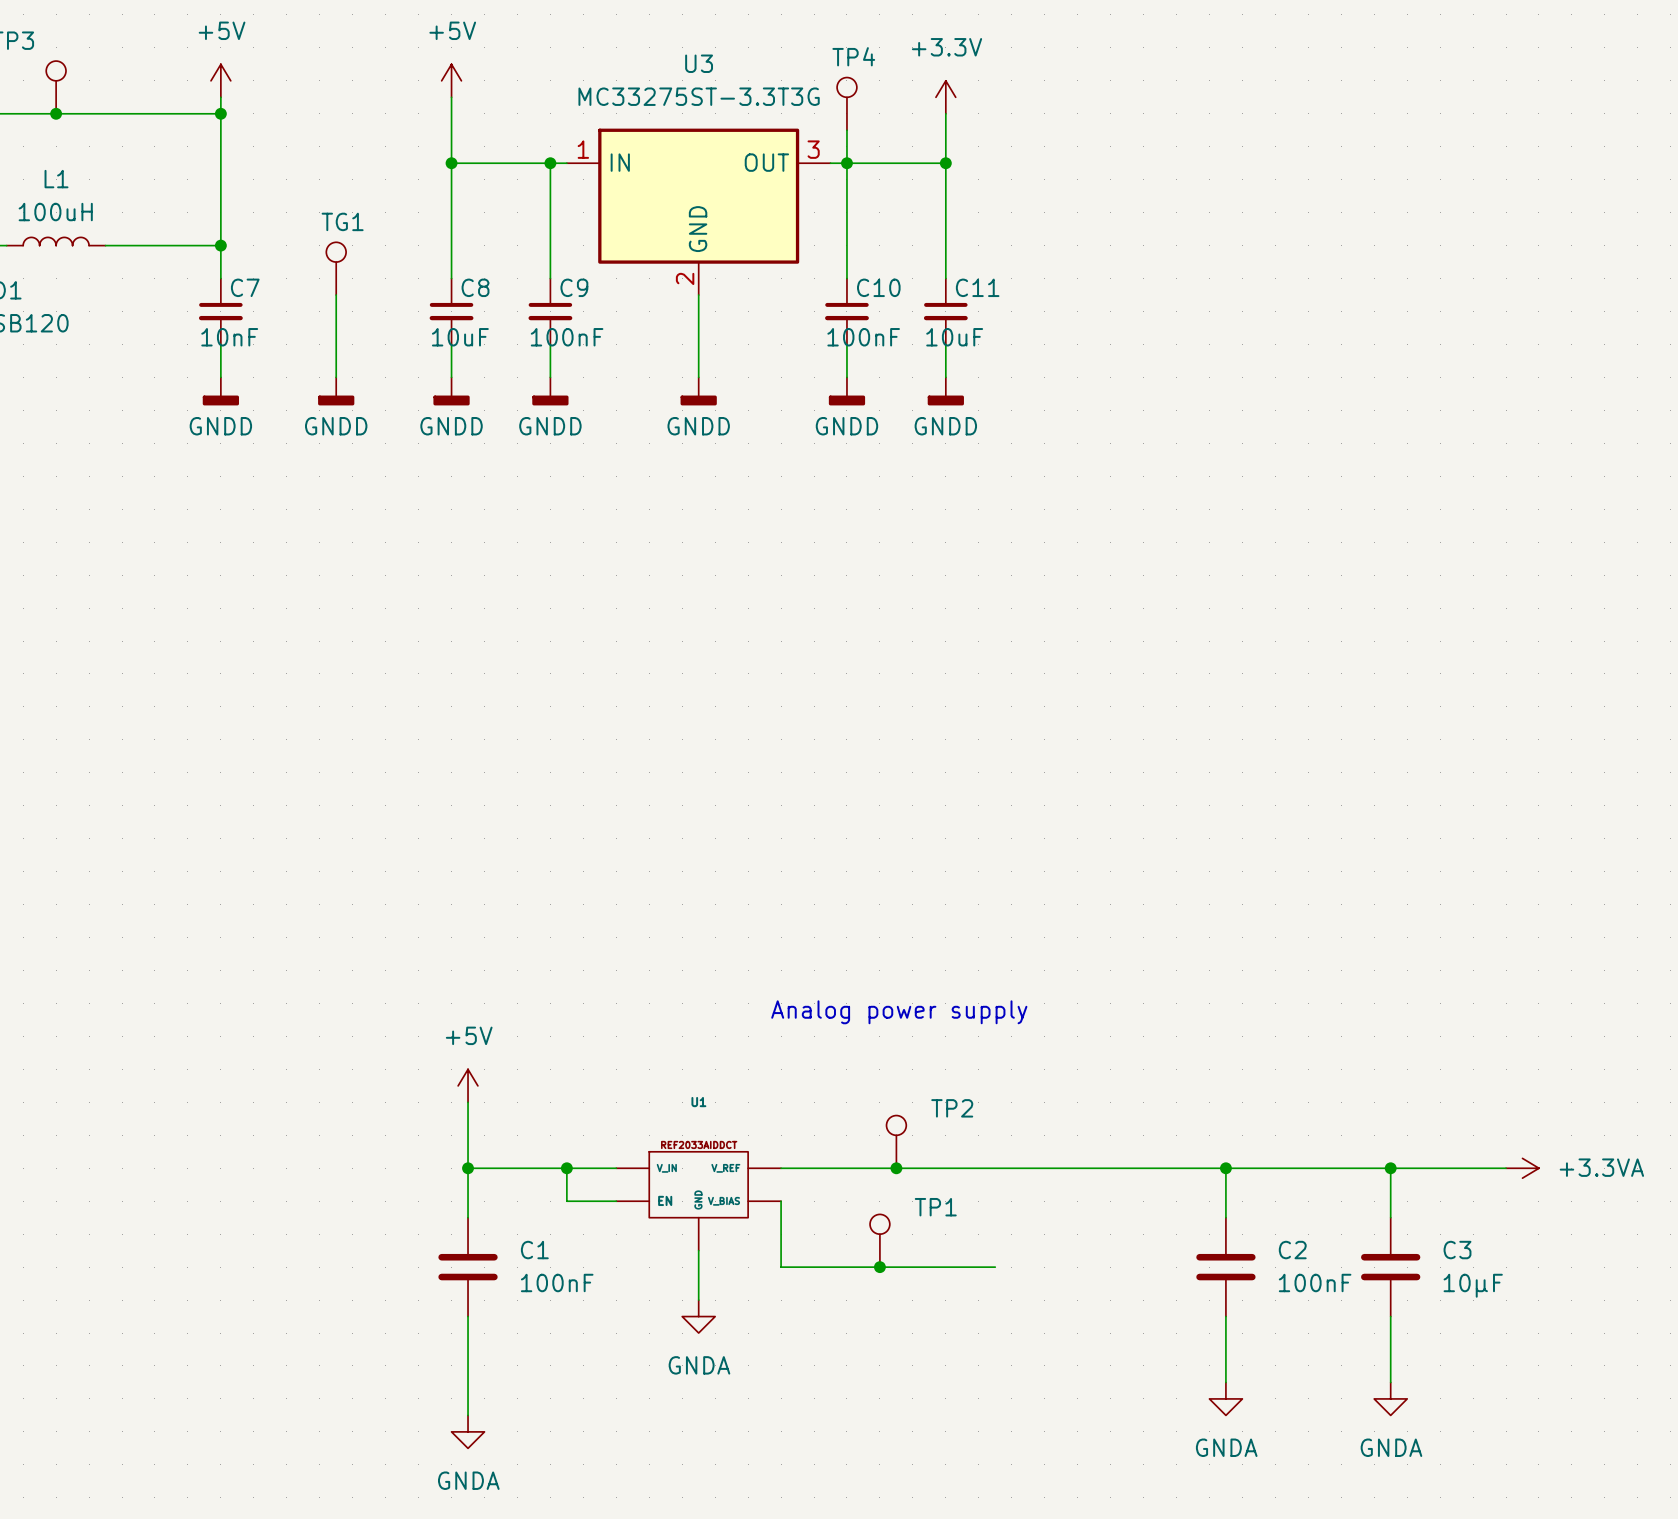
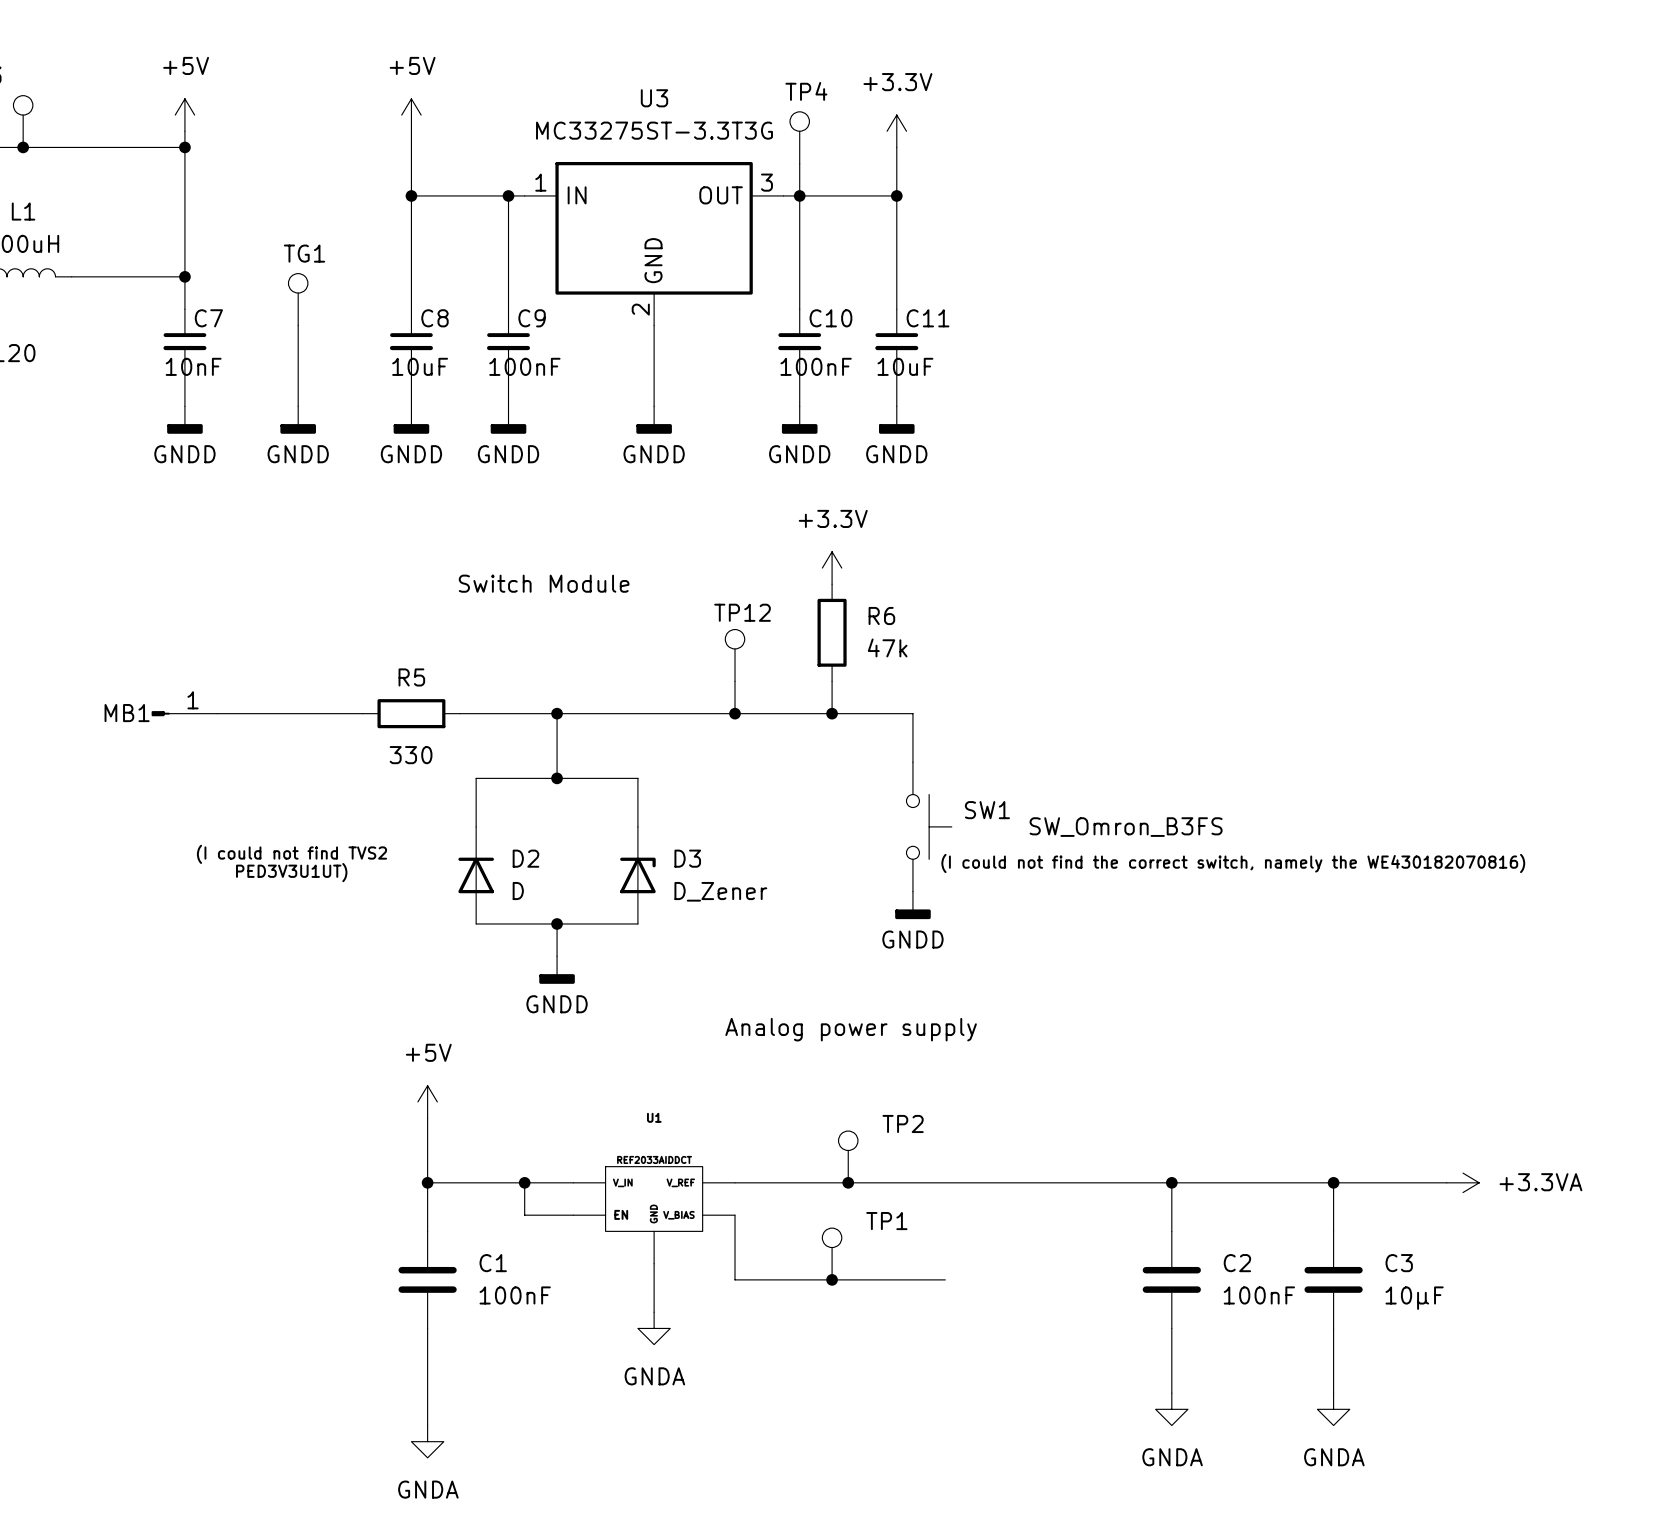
power symbol: none -> +3.3V (832, 568)
text: none -> Switch Module (544, 583)
R6: none -> 47k (832, 632)
TP12: none -> (735, 655)
wire: none -> (735, 681) (735, 713)
wire: none -> (832, 681) (832, 713)
MB1: none -> (184, 713)
wire: none -> (217, 713) (362, 713)
R5: none -> 330 (411, 713)
wire: none -> (459, 713) (912, 713) (912, 762)
wire: none -> (557, 713) (557, 778)
junction: none -> (557, 713)
junction: none -> (735, 713)
junction: none -> (832, 713)
junction: none -> (557, 778)
wire: none -> (476, 826) (476, 778) (637, 778) (637, 826)
SW1: none -> SW_Omron_B3FS (929, 826)
text: none -> (I could not find TVS2 (291, 854)
text: none -> (I could not find the correct switch, namely the WE430182070816) (1233, 863)
text: none -> PED3V3U1UT) (291, 872)
D2: none -> D (476, 875)
D3: none -> D_Zener (637, 875)
power symbol: none -> GNDD (912, 905)
wire: none -> (476, 923) (637, 923)
wire: none -> (557, 923) (557, 956)
junction: none -> (557, 923)
power symbol: none -> GNDD (557, 970)

